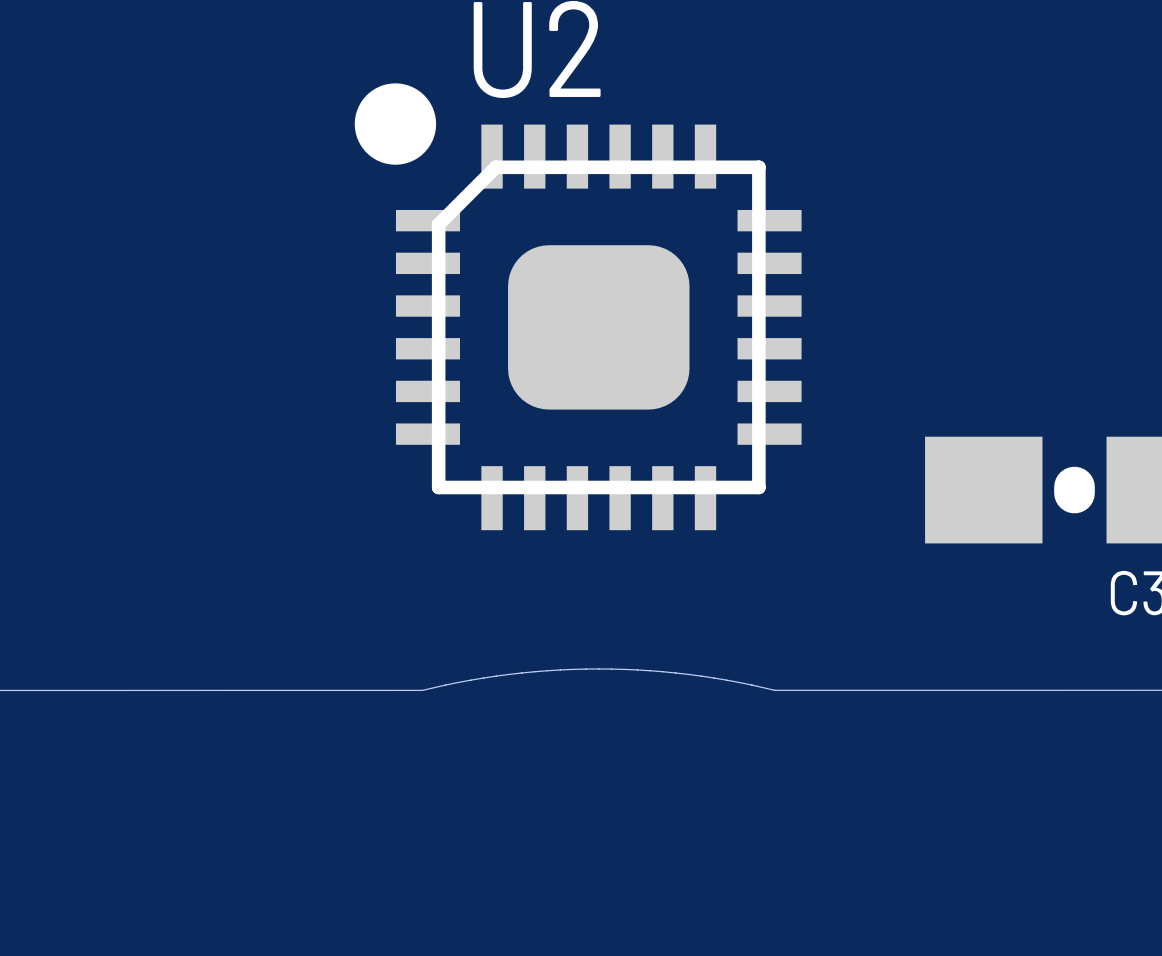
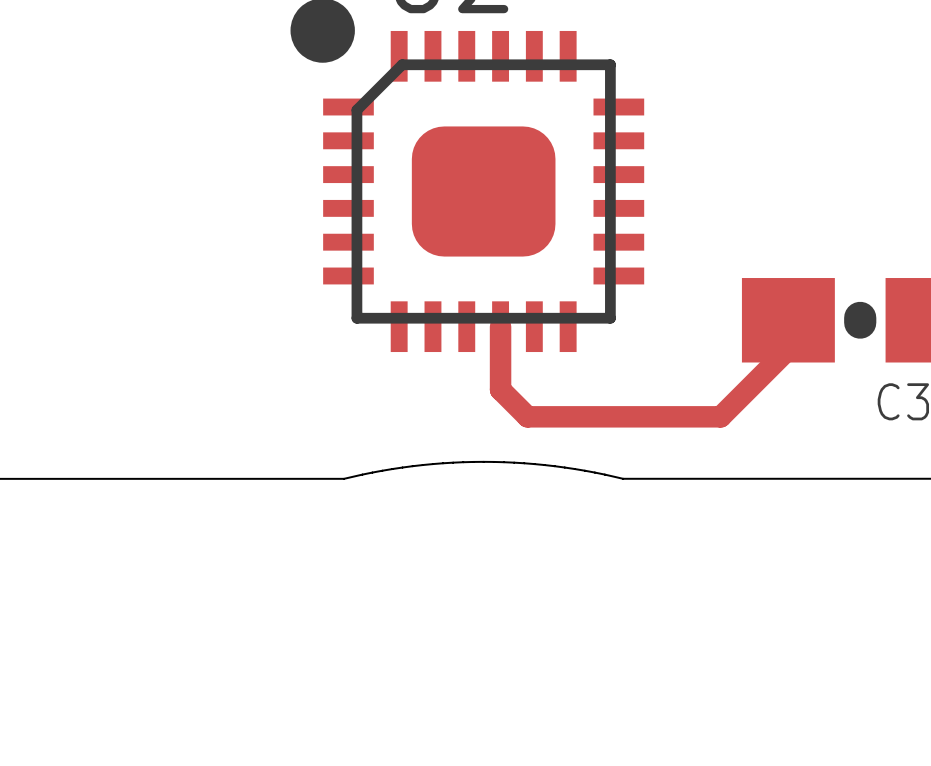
track: none -> (788, 320) (788, 349) (720, 416) (527, 416) (500, 389) (500, 326)

